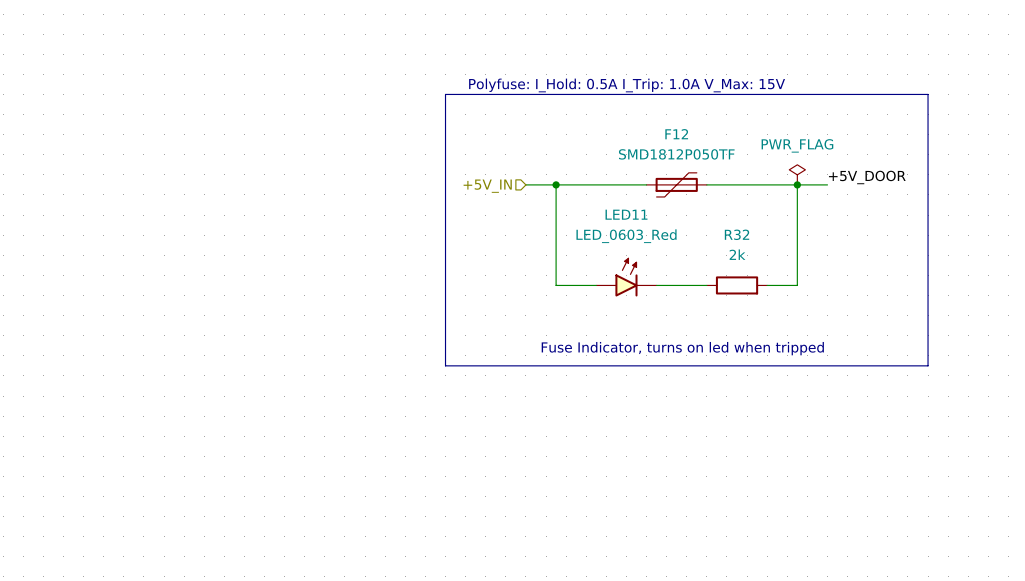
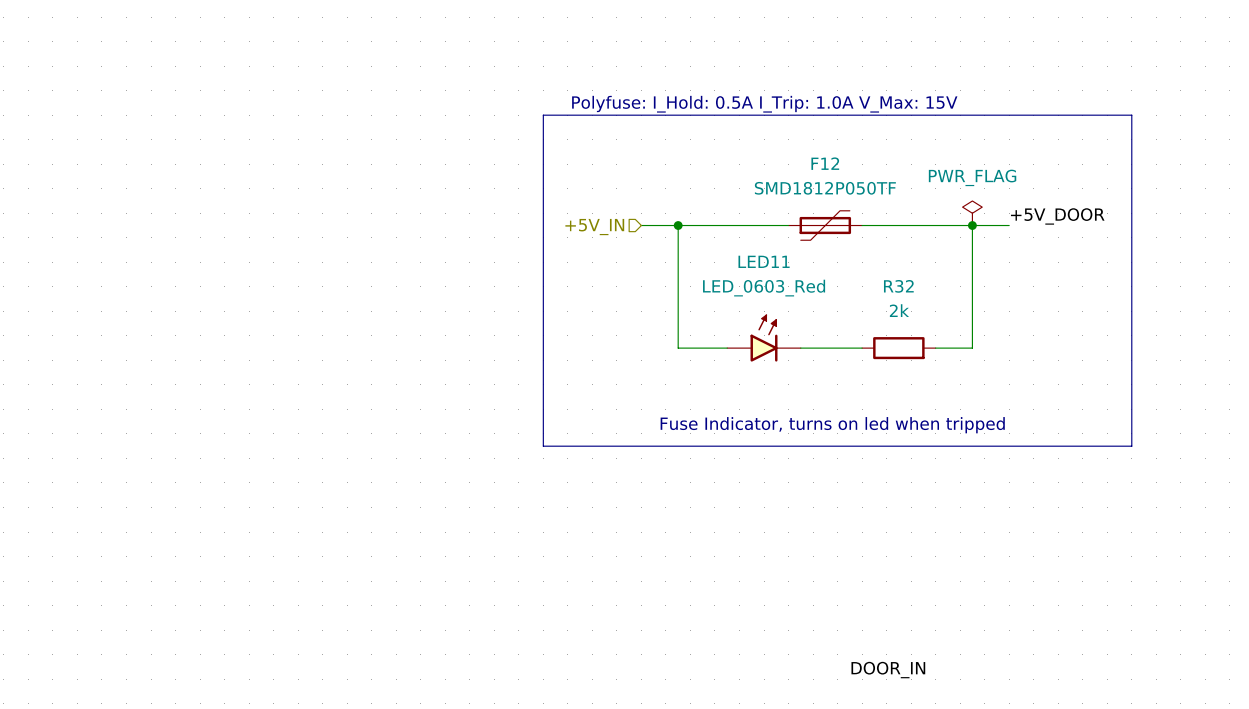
label: none -> DOOR_IN (888, 670)

